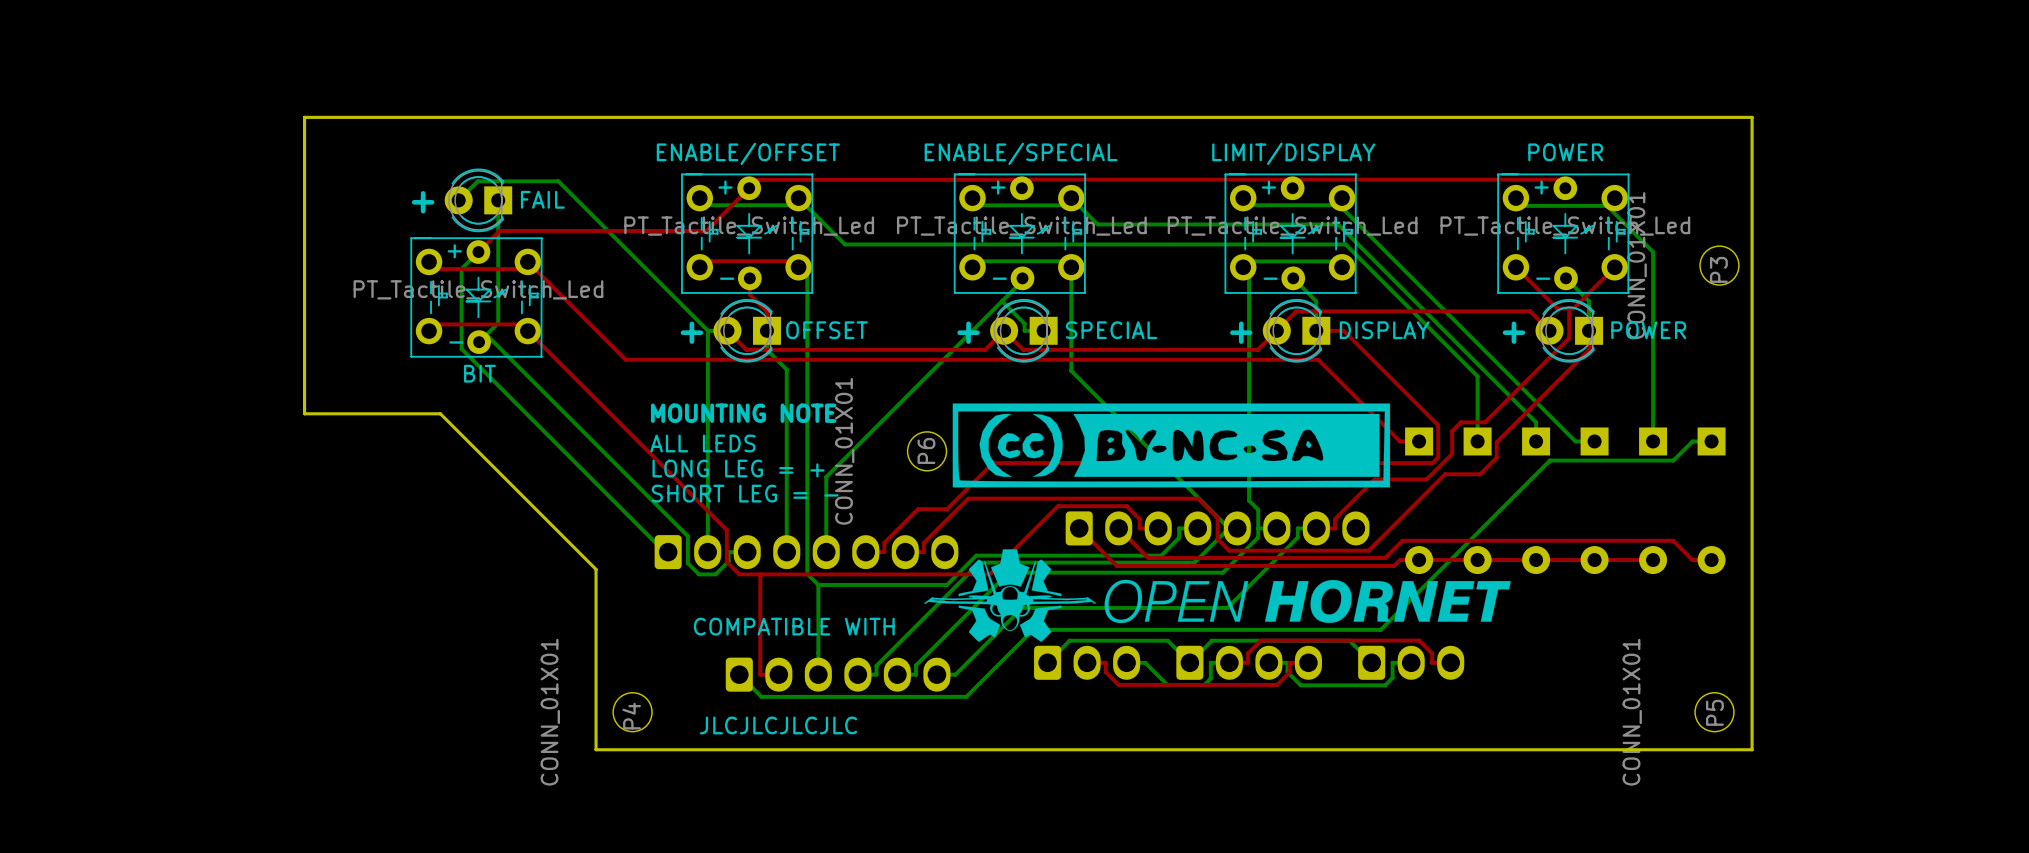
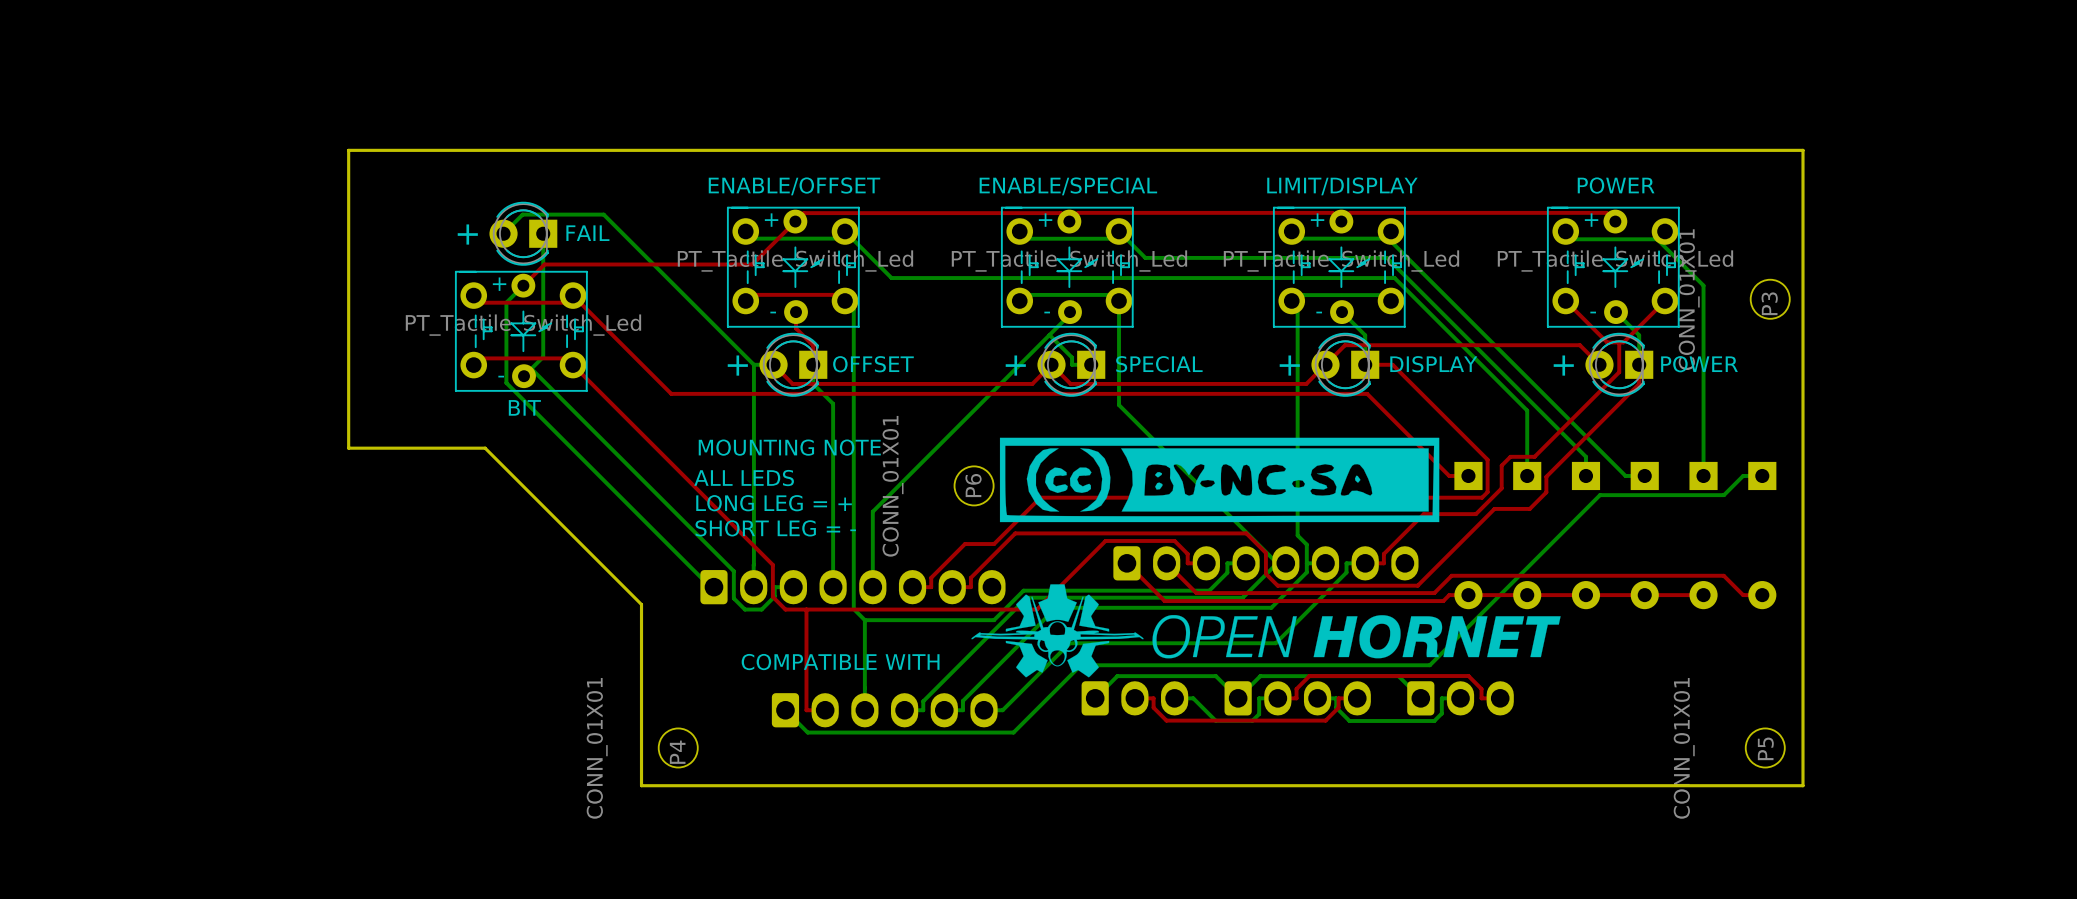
text: JLCJLCJLCJLC (778, 725) -> none

